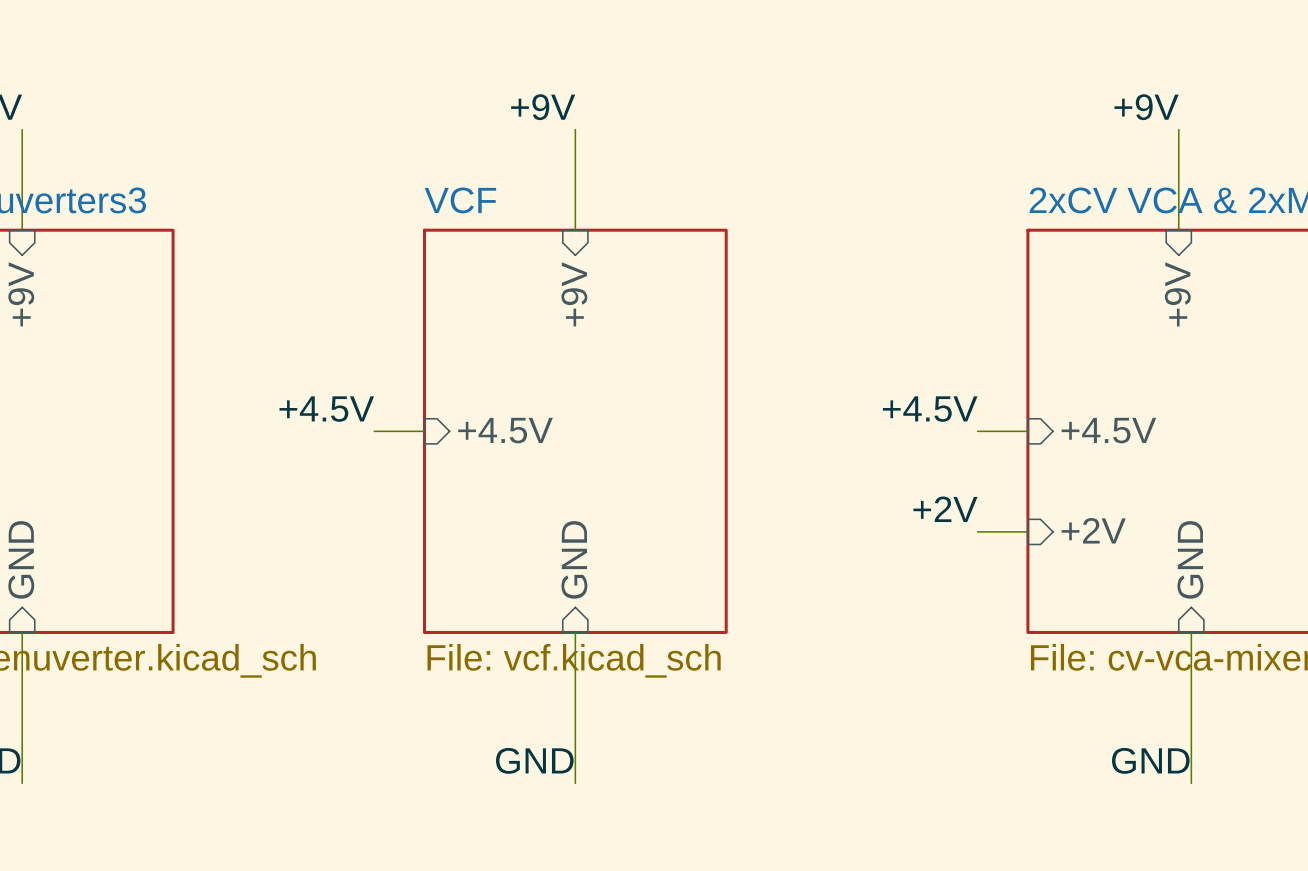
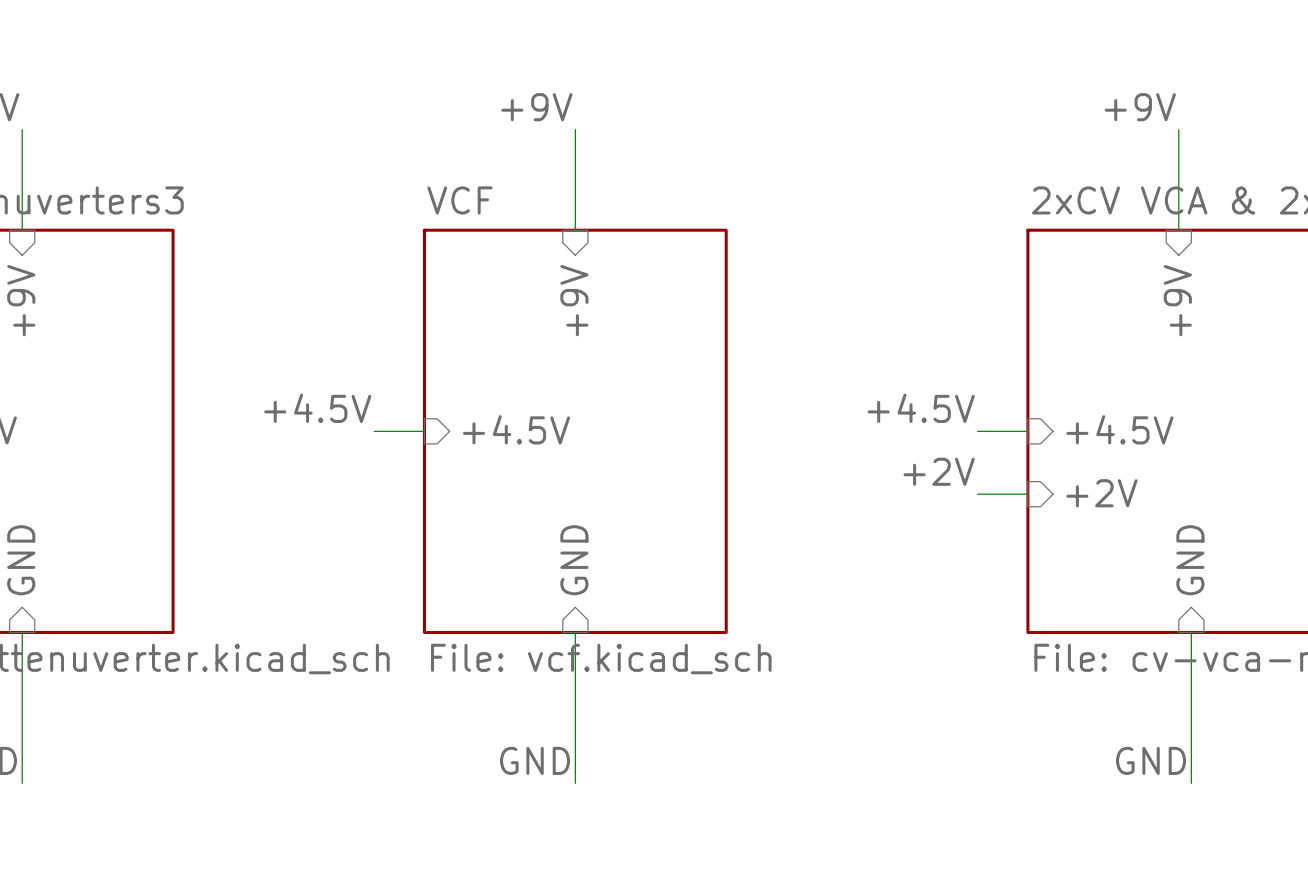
label position: +2V (945, 509) -> +2V (939, 471)
sheet pin position: +2V (1093, 530) -> +2V (1101, 493)
wire: (977, 531) (1027, 531) -> (977, 494) (1027, 494)

